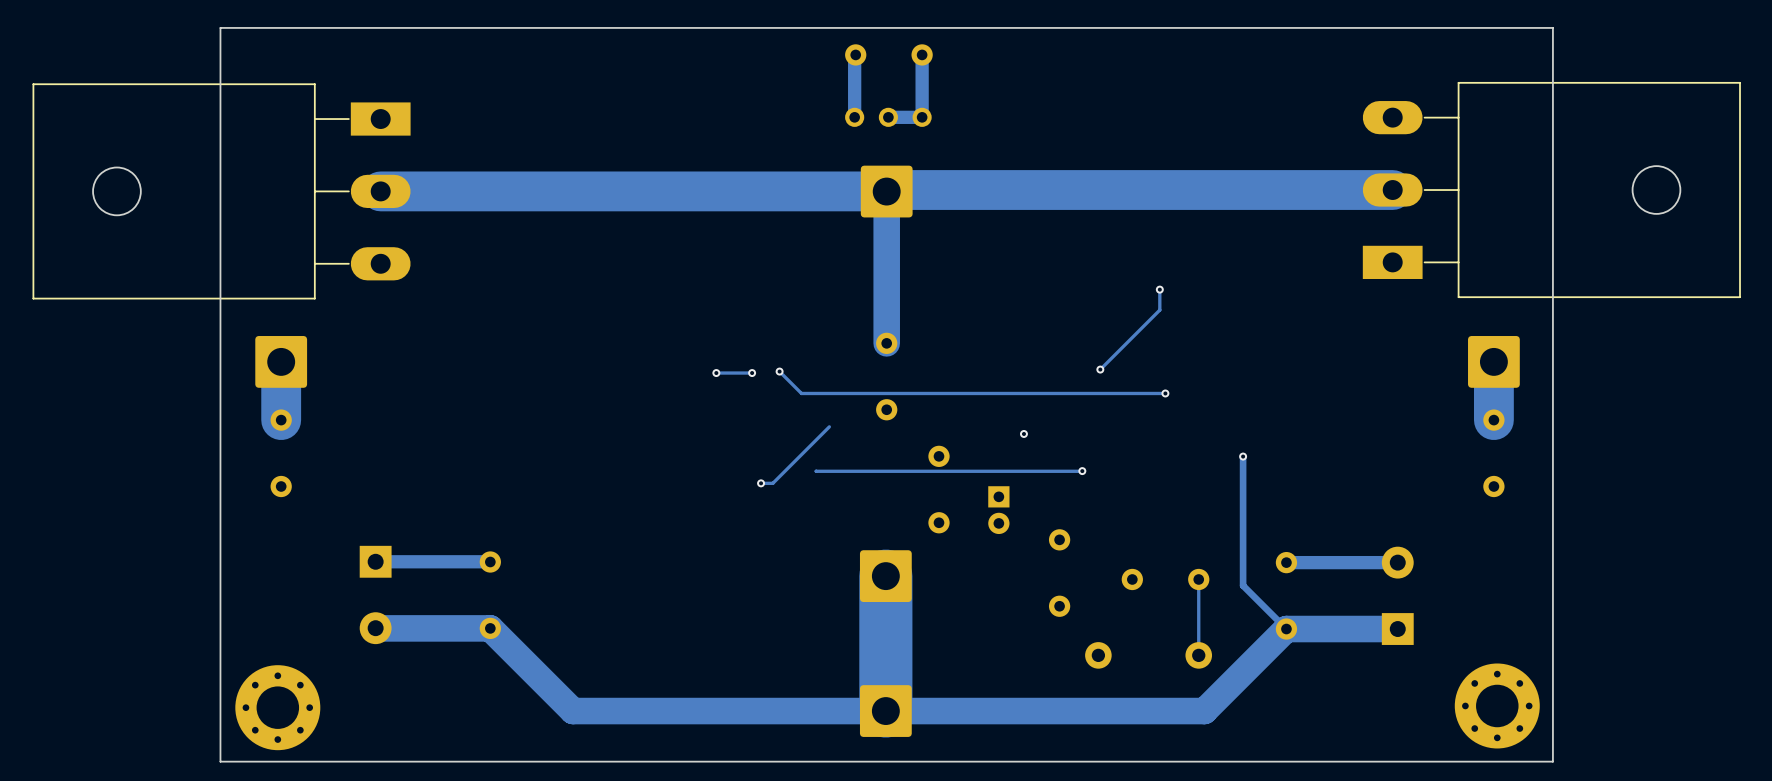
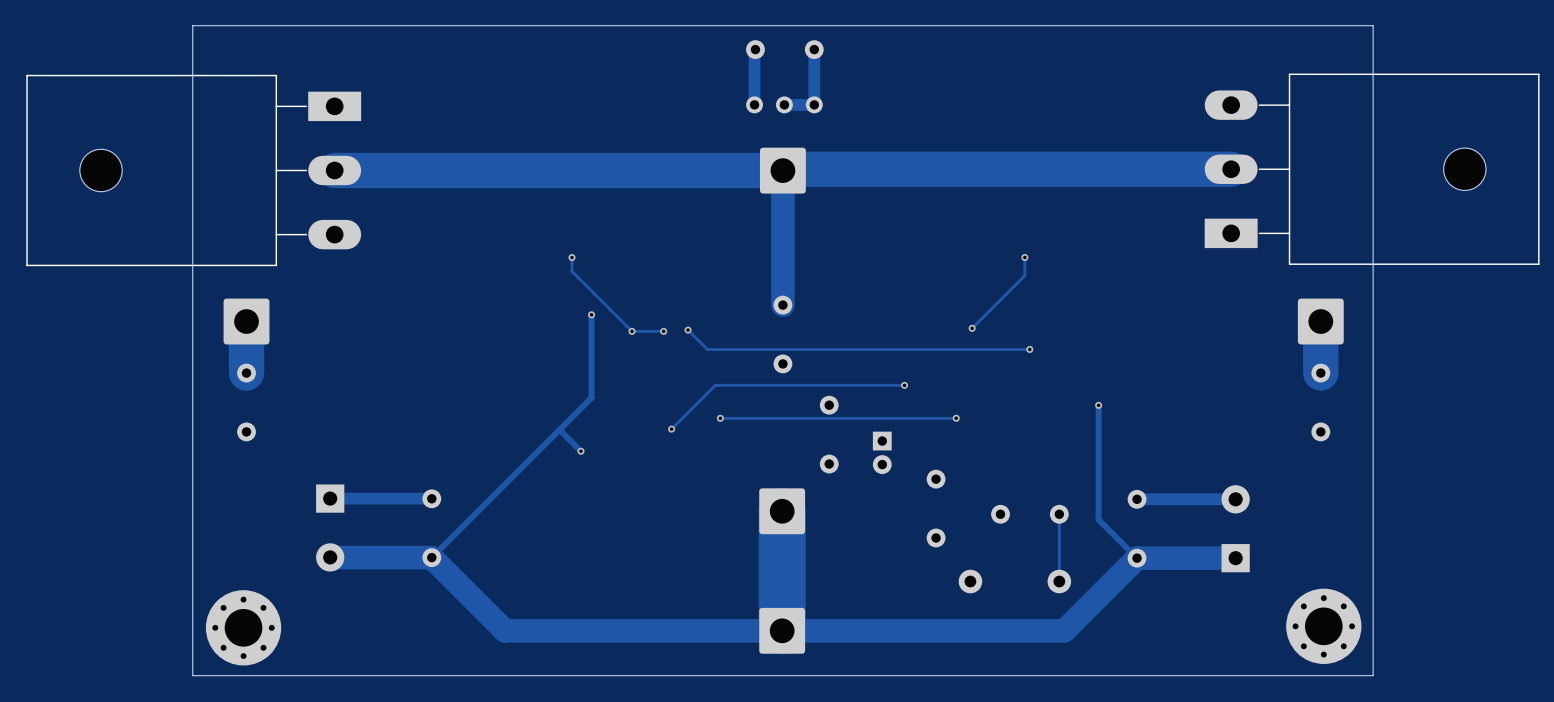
track: none -> (572, 257) (572, 271) (632, 331)
via: none -> (572, 257)
track: none -> (591, 314) (591, 397) (431, 557)
via: none -> (591, 314)
track: (829, 426) (772, 483) (761, 483) -> (904, 385) (715, 385) (671, 429)
via: none -> (720, 418)
track: none -> (558, 430) (580, 451)
via: none -> (580, 451)

